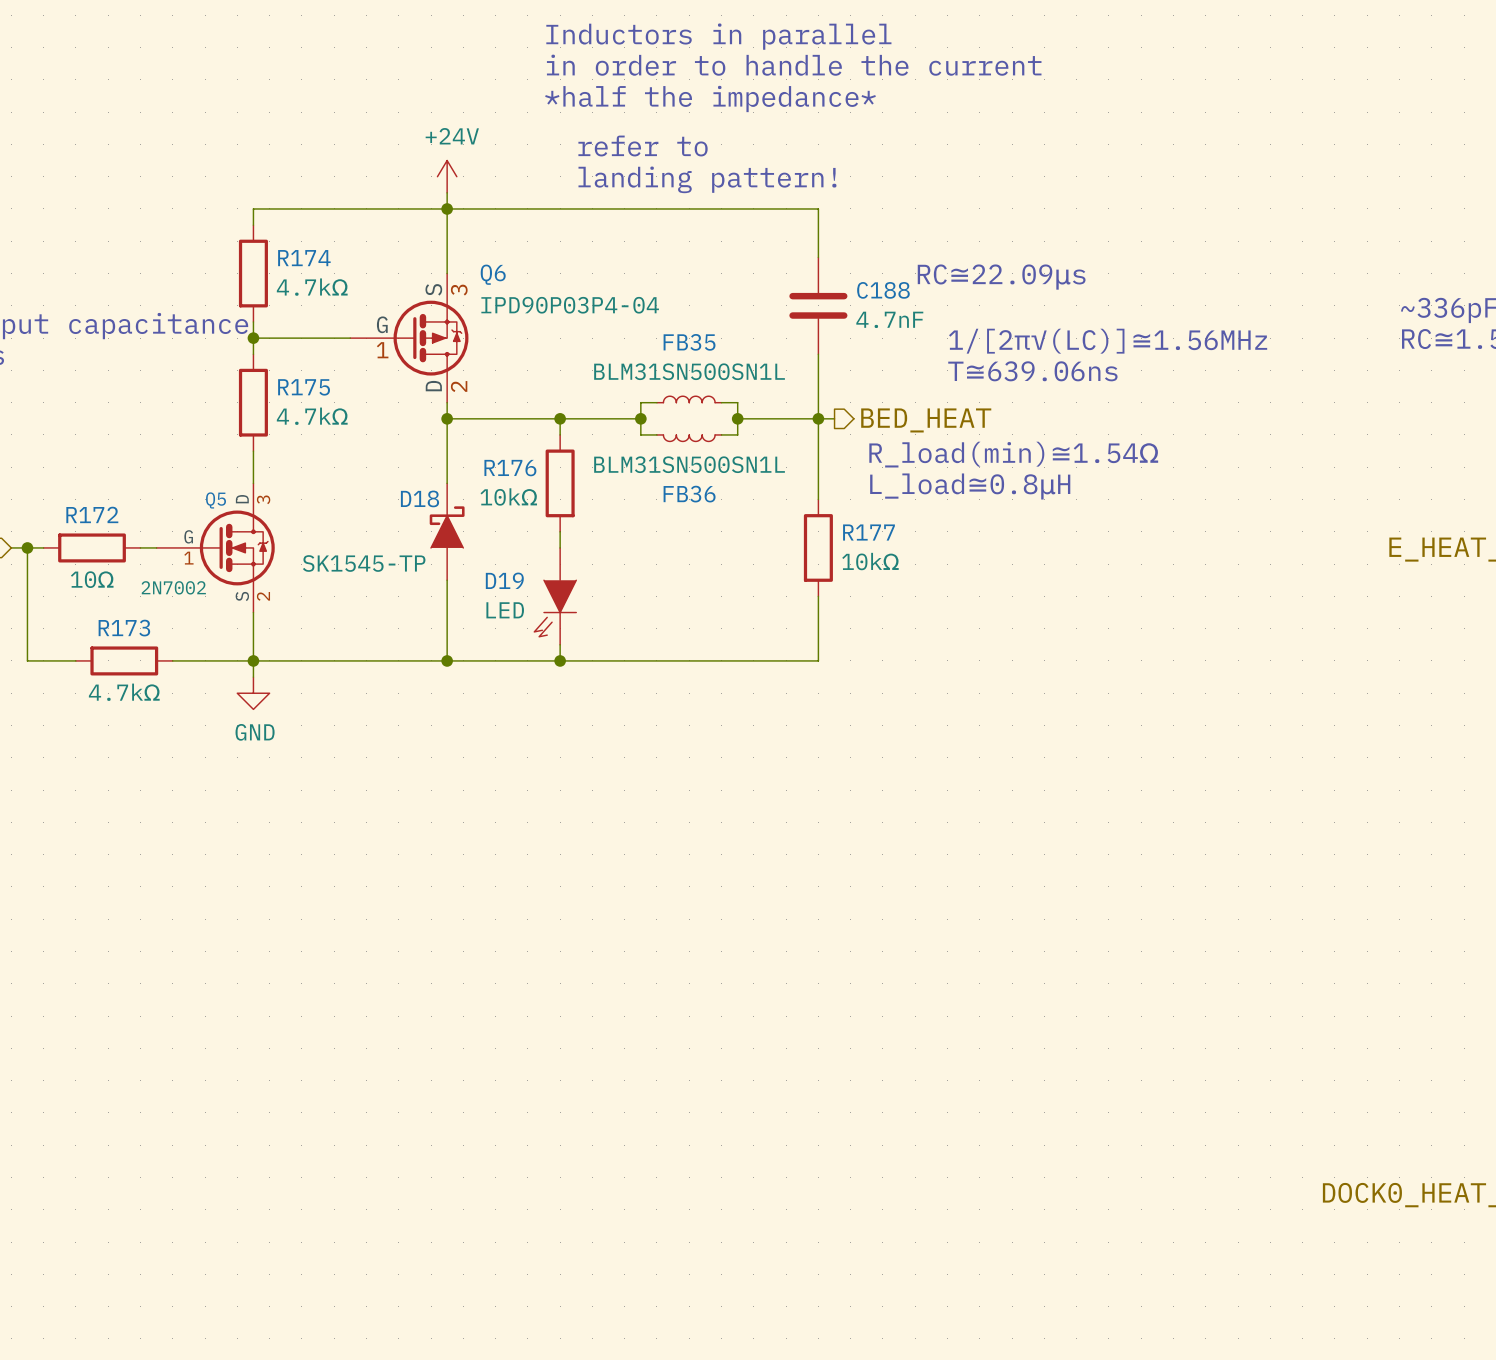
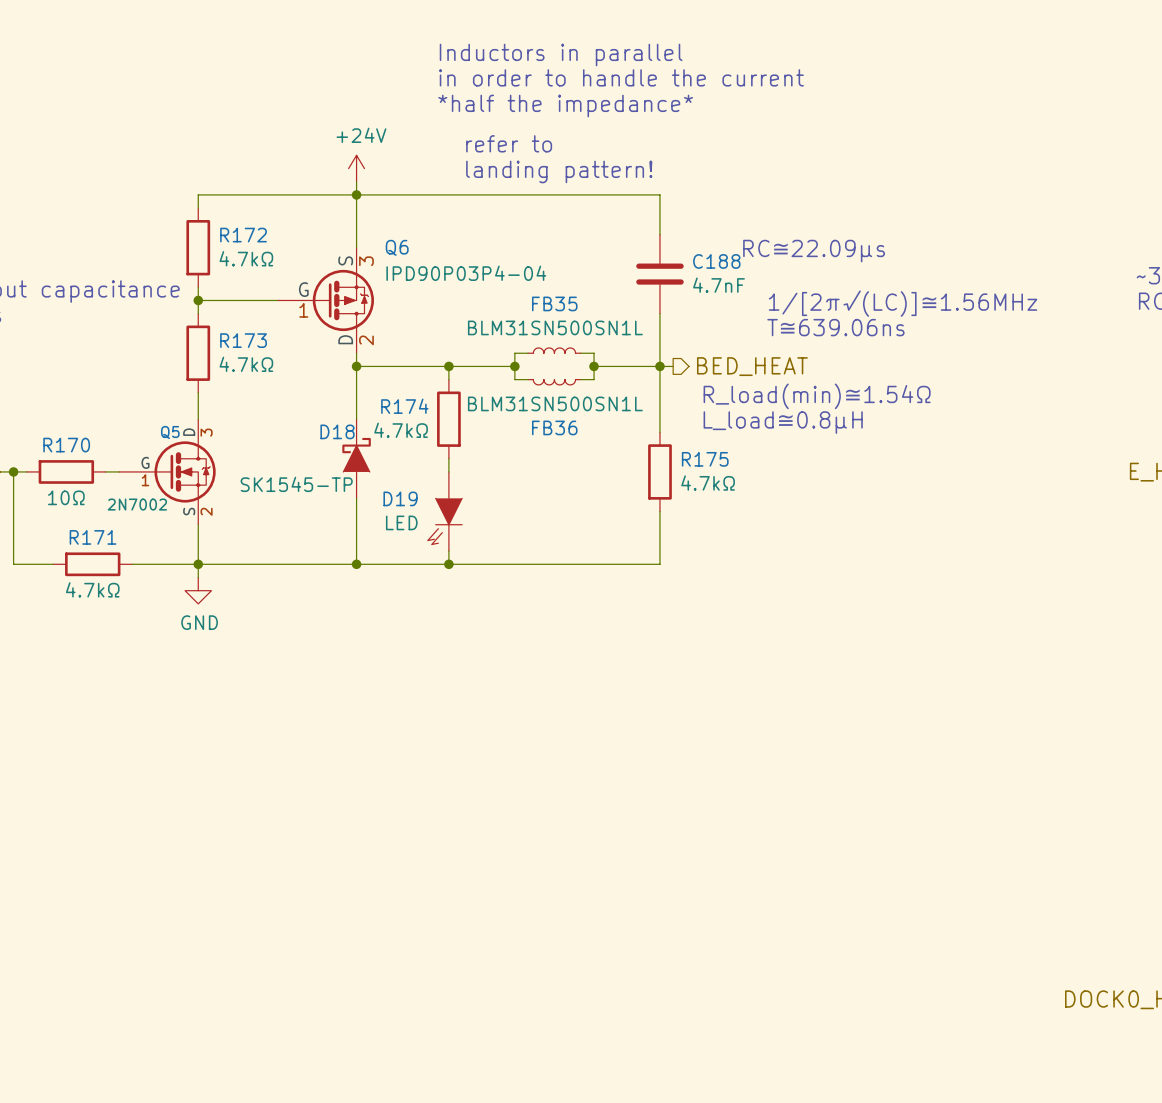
R174 name: R174 (304, 258) -> R172 (243, 235)
R175 name: R175 (304, 387) -> R173 (243, 340)
R176 name: R176 (510, 468) -> R174 (404, 406)
R176 value: 10kΩ (508, 496) -> 4.7kΩ (401, 430)
R172 name: R172 (92, 514) -> R170 (66, 445)
R177 name: R177 (868, 532) -> R175 (705, 459)
R177 value: 10kΩ (870, 561) -> 4.7kΩ (708, 483)
R173 name: R173 (124, 628) -> R171 (93, 537)

